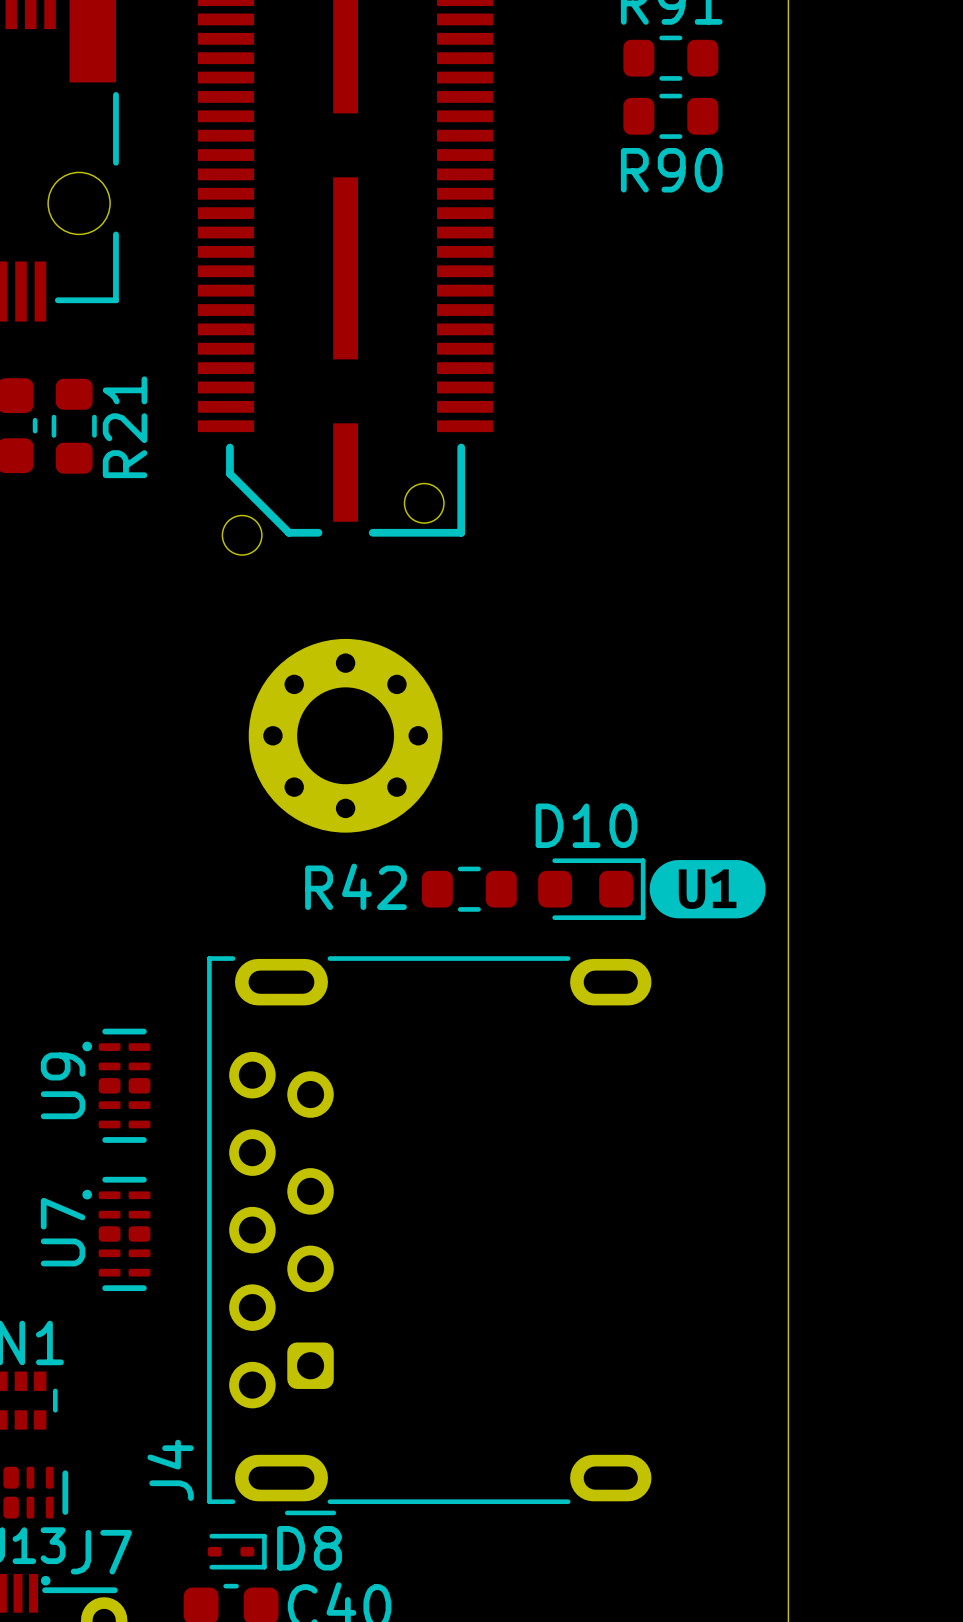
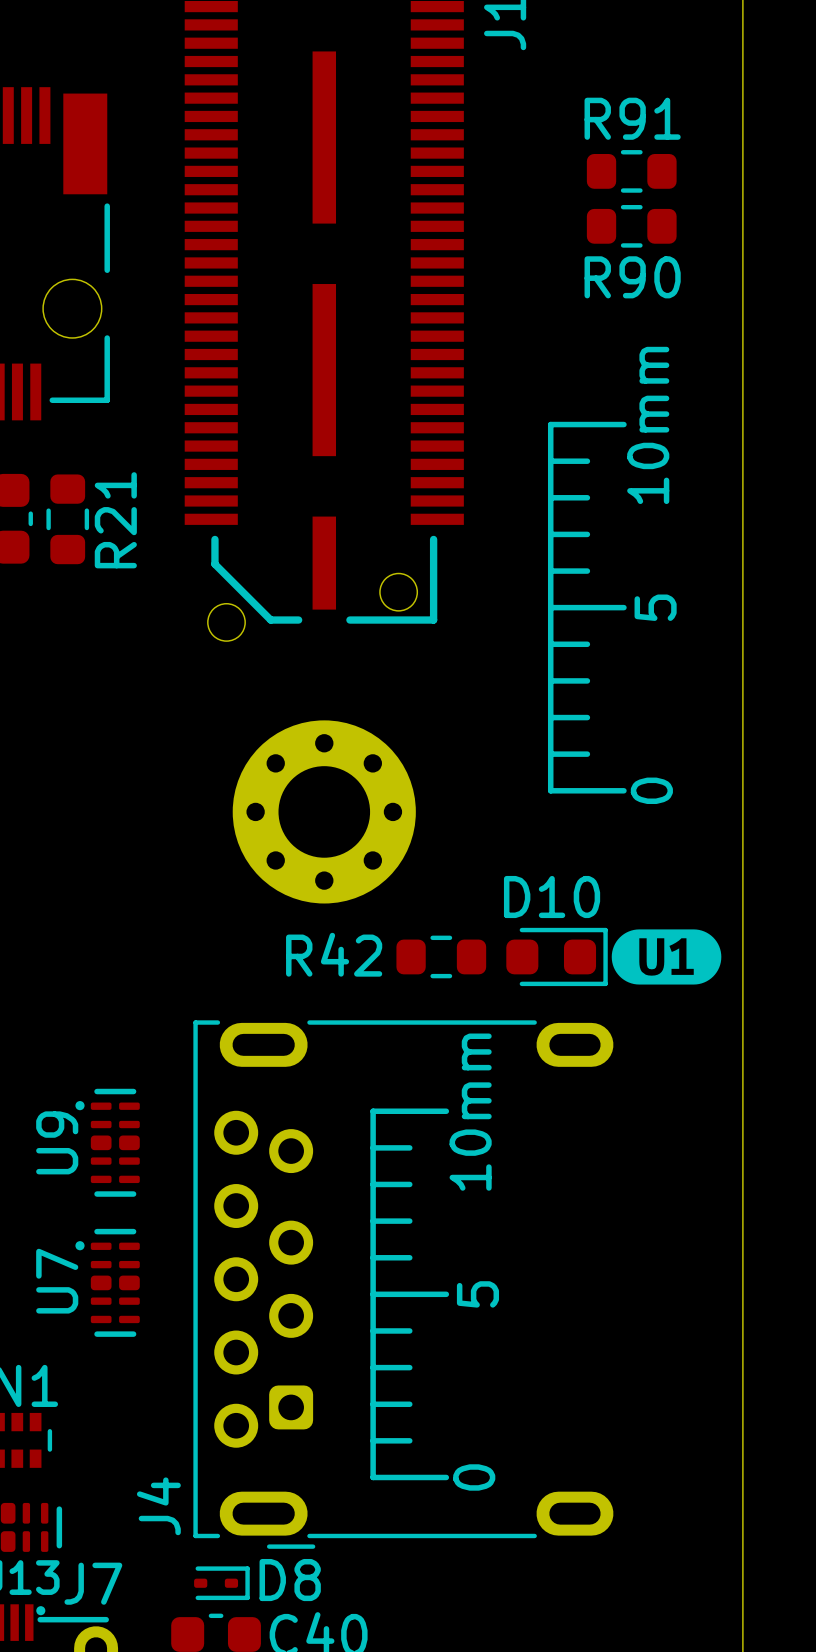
drawing: none -> [547, 421, 627, 794]
drawing: none -> [370, 1108, 450, 1481]

